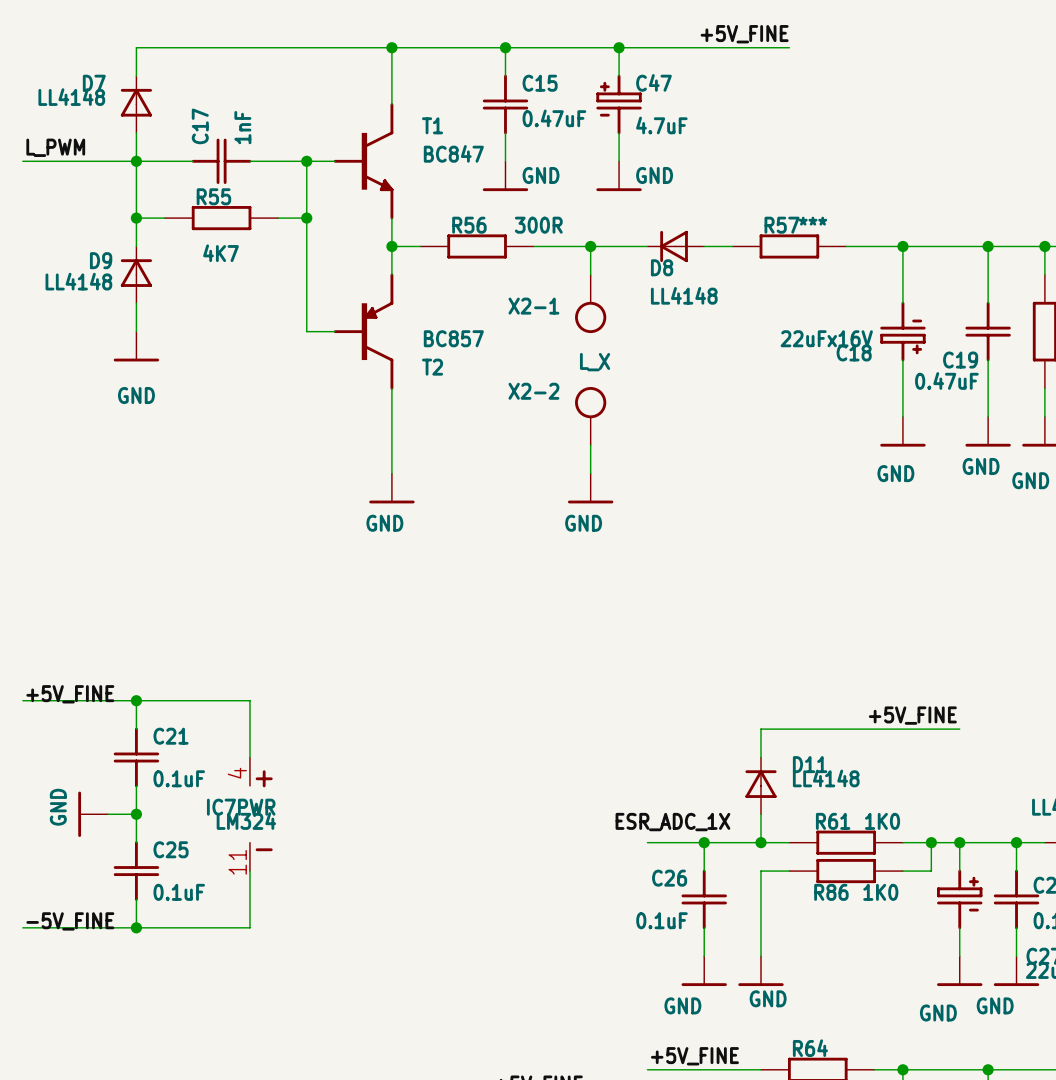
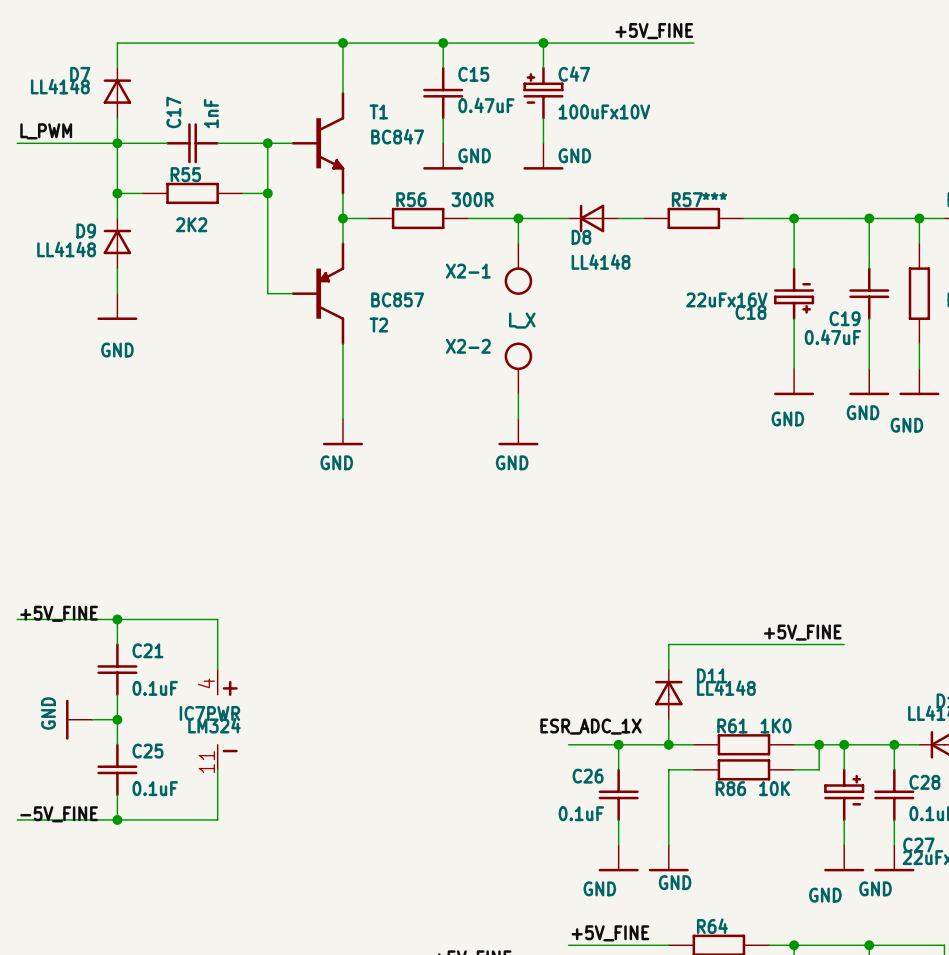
C47 value: 4.7uF (661, 125) -> 100uFx10V (604, 111)
R55 value: 4K7 (221, 253) -> 2K2 (191, 224)
R86 value: 1K0 (880, 892) -> 10K (774, 788)

